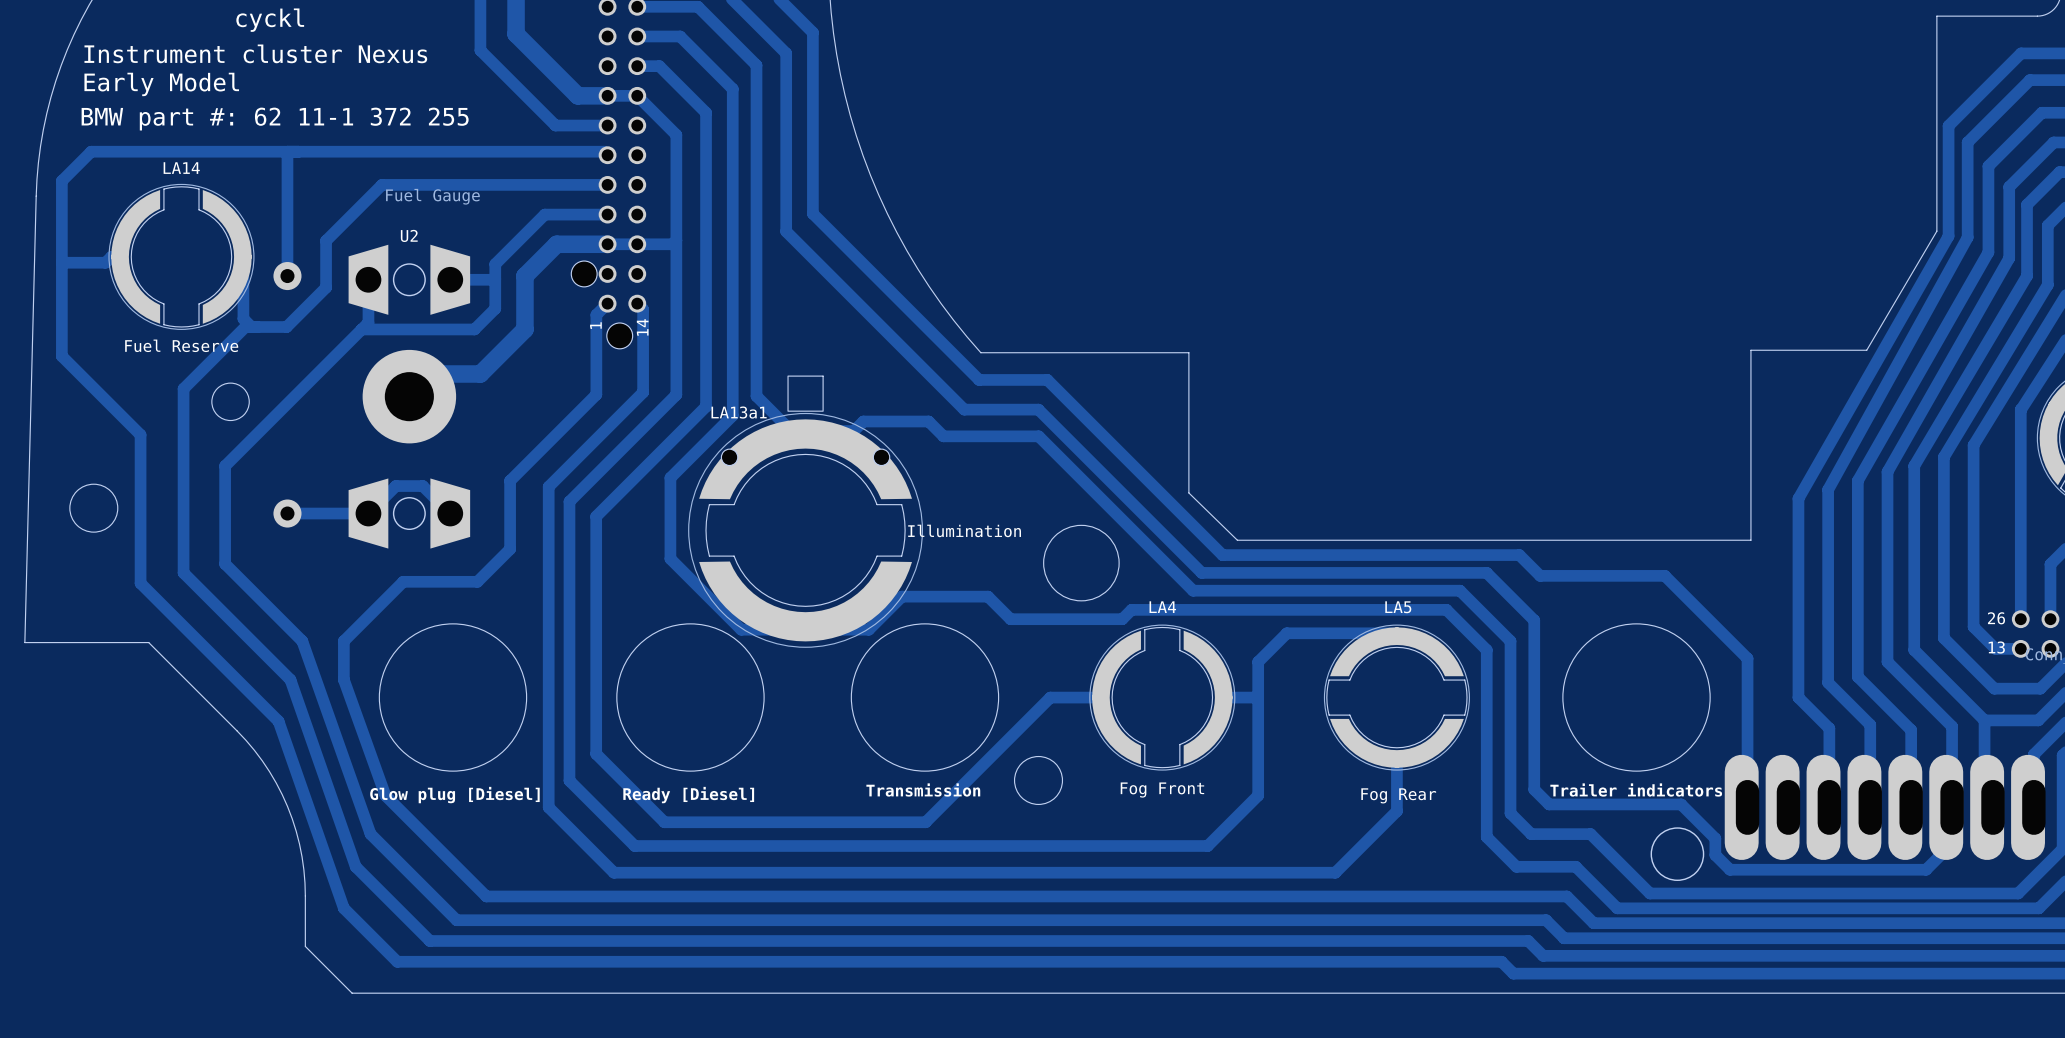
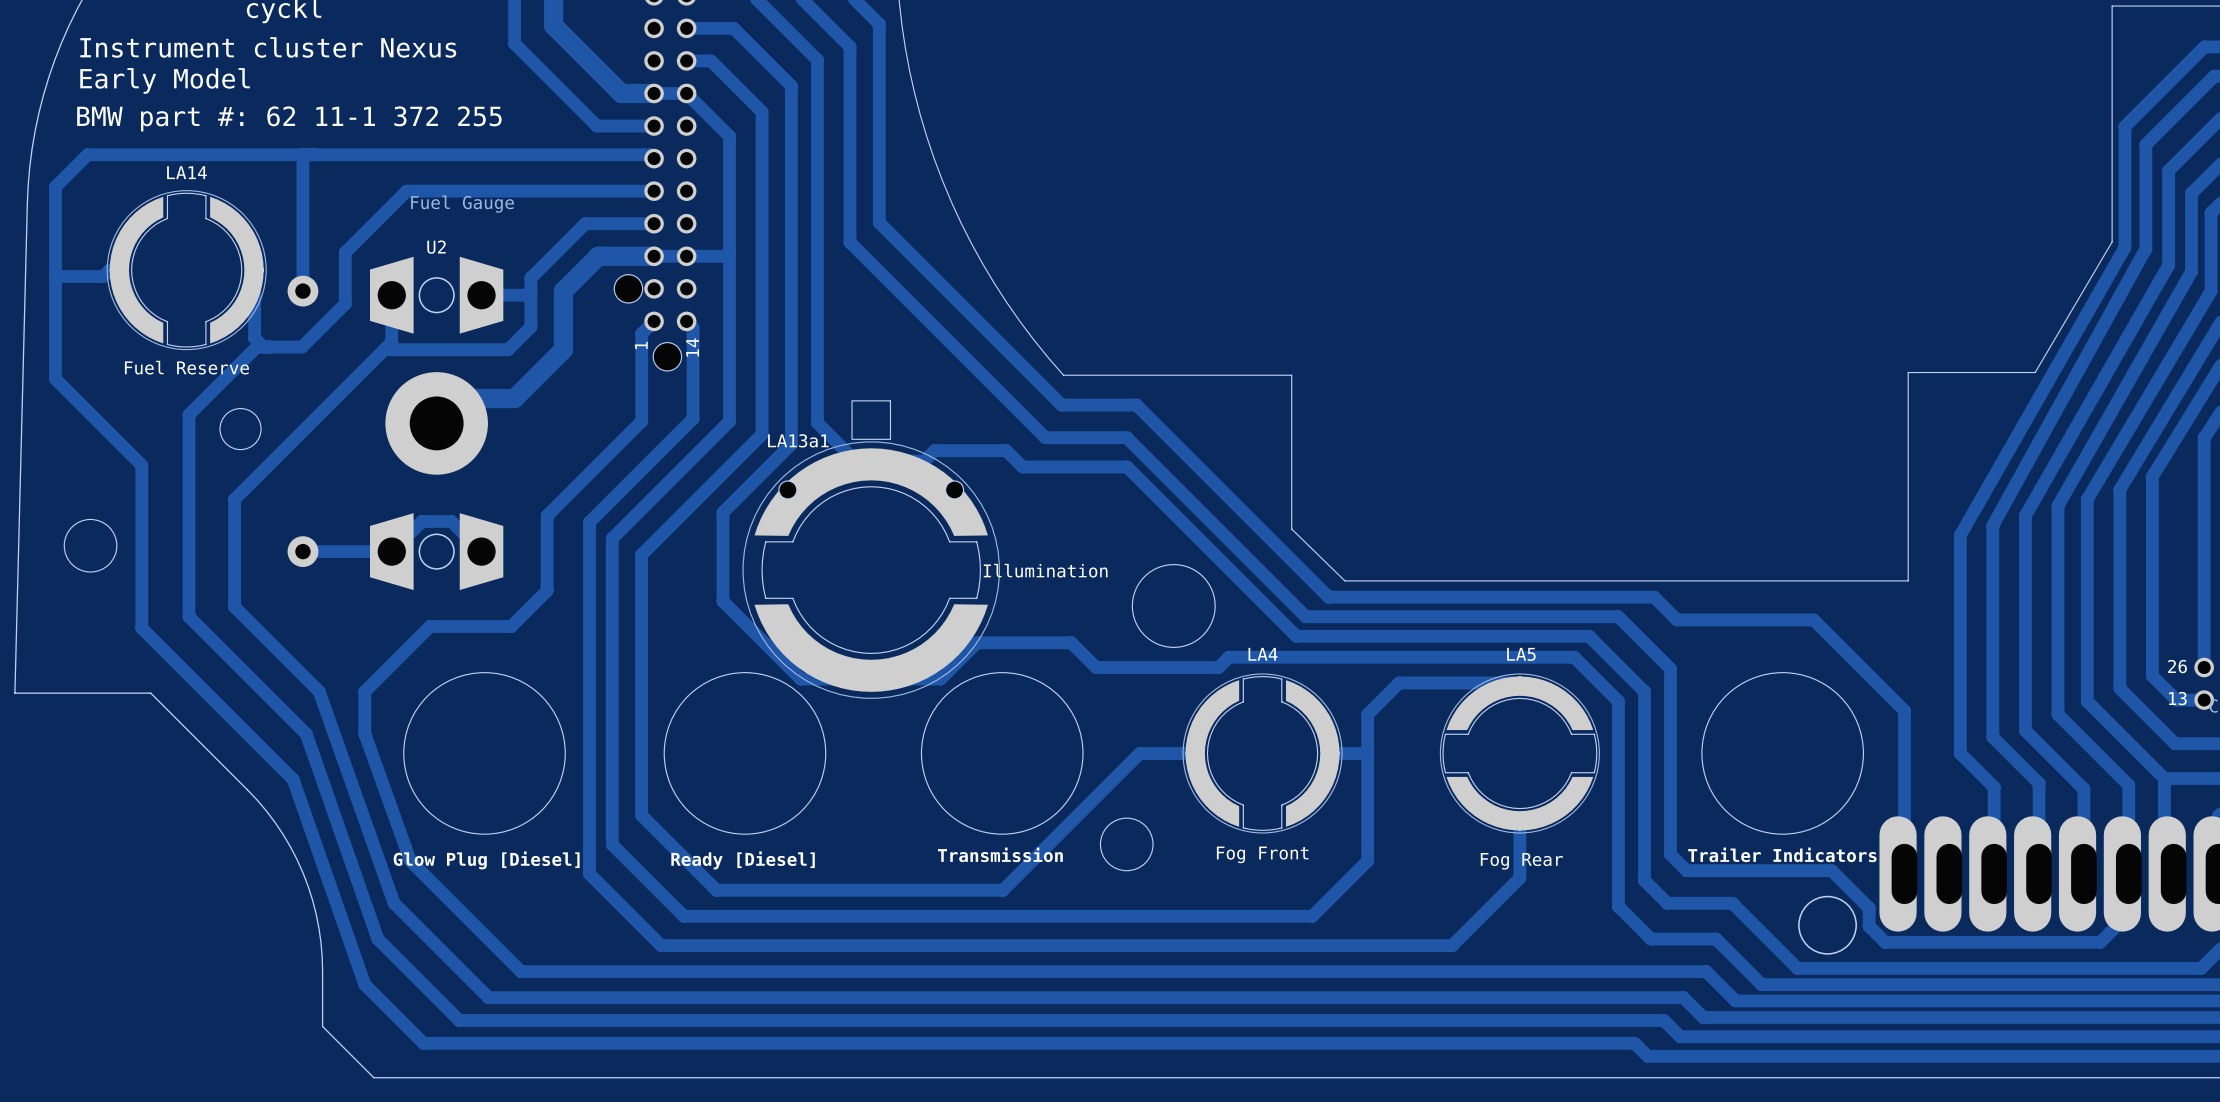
text: Trailer indicators (1636, 790) -> Trailer Indicators (1782, 854)
text: Glow plug [Diesel] (454, 795) -> Glow Plug [Diesel] (486, 860)

